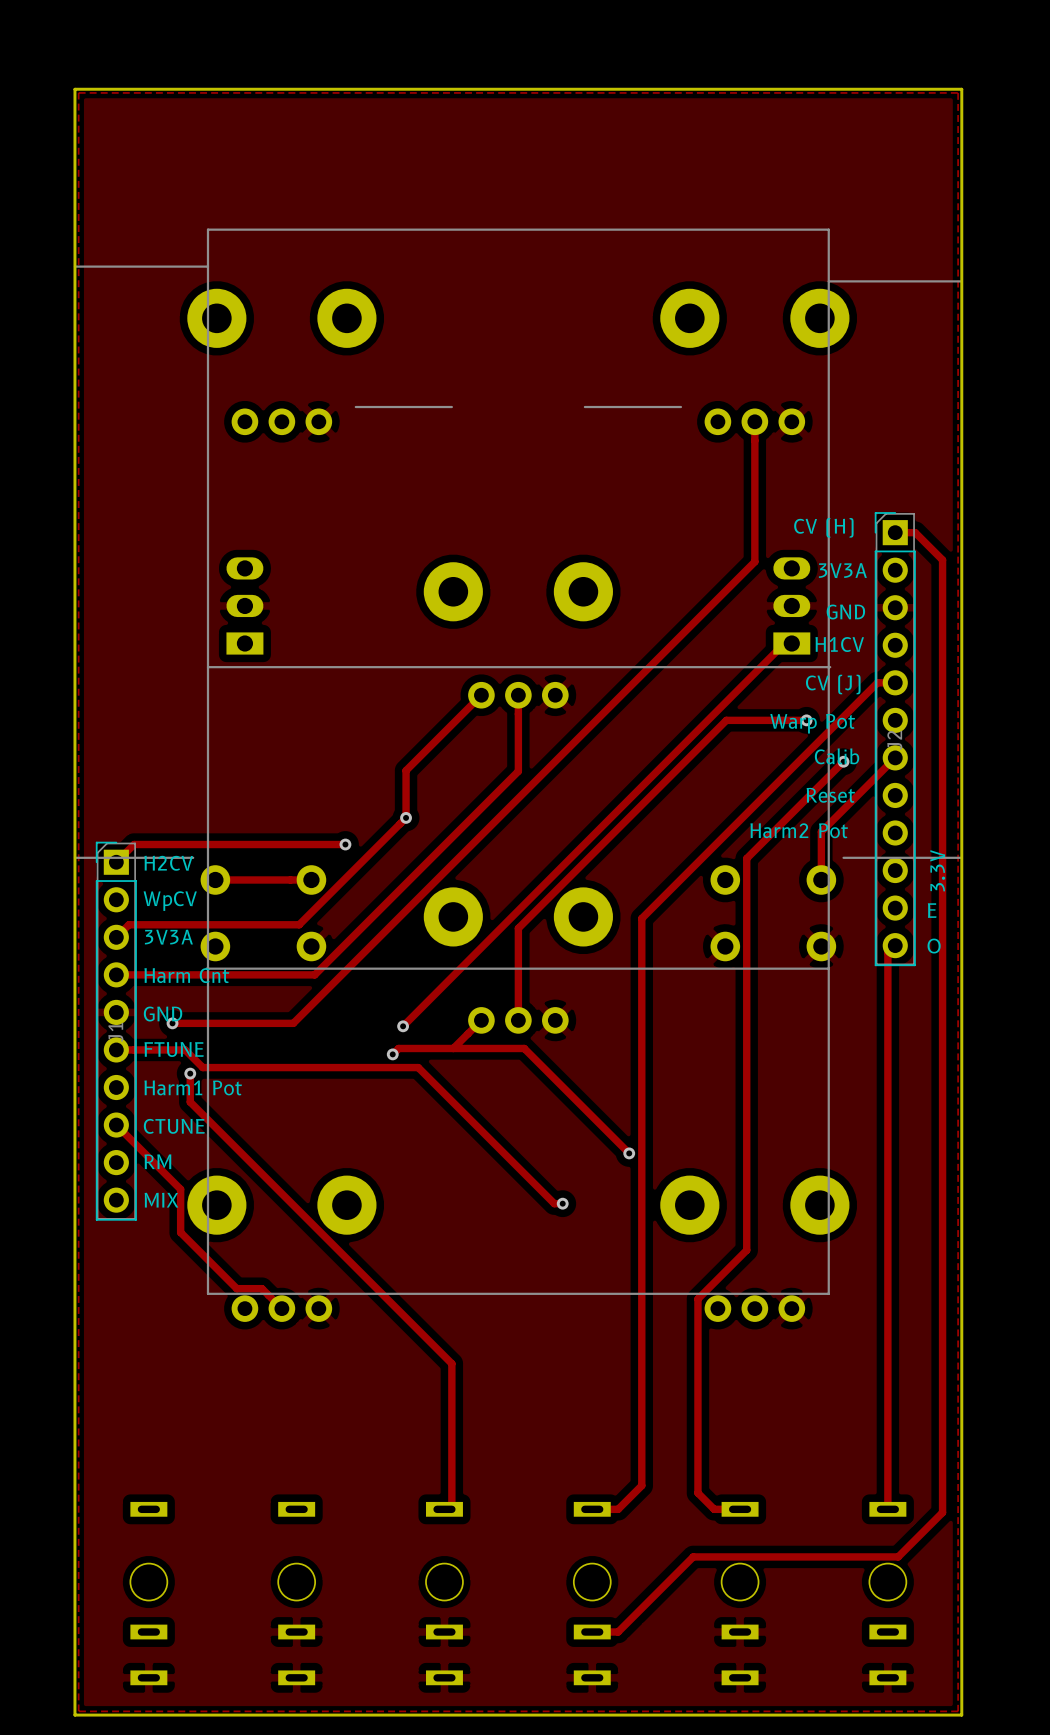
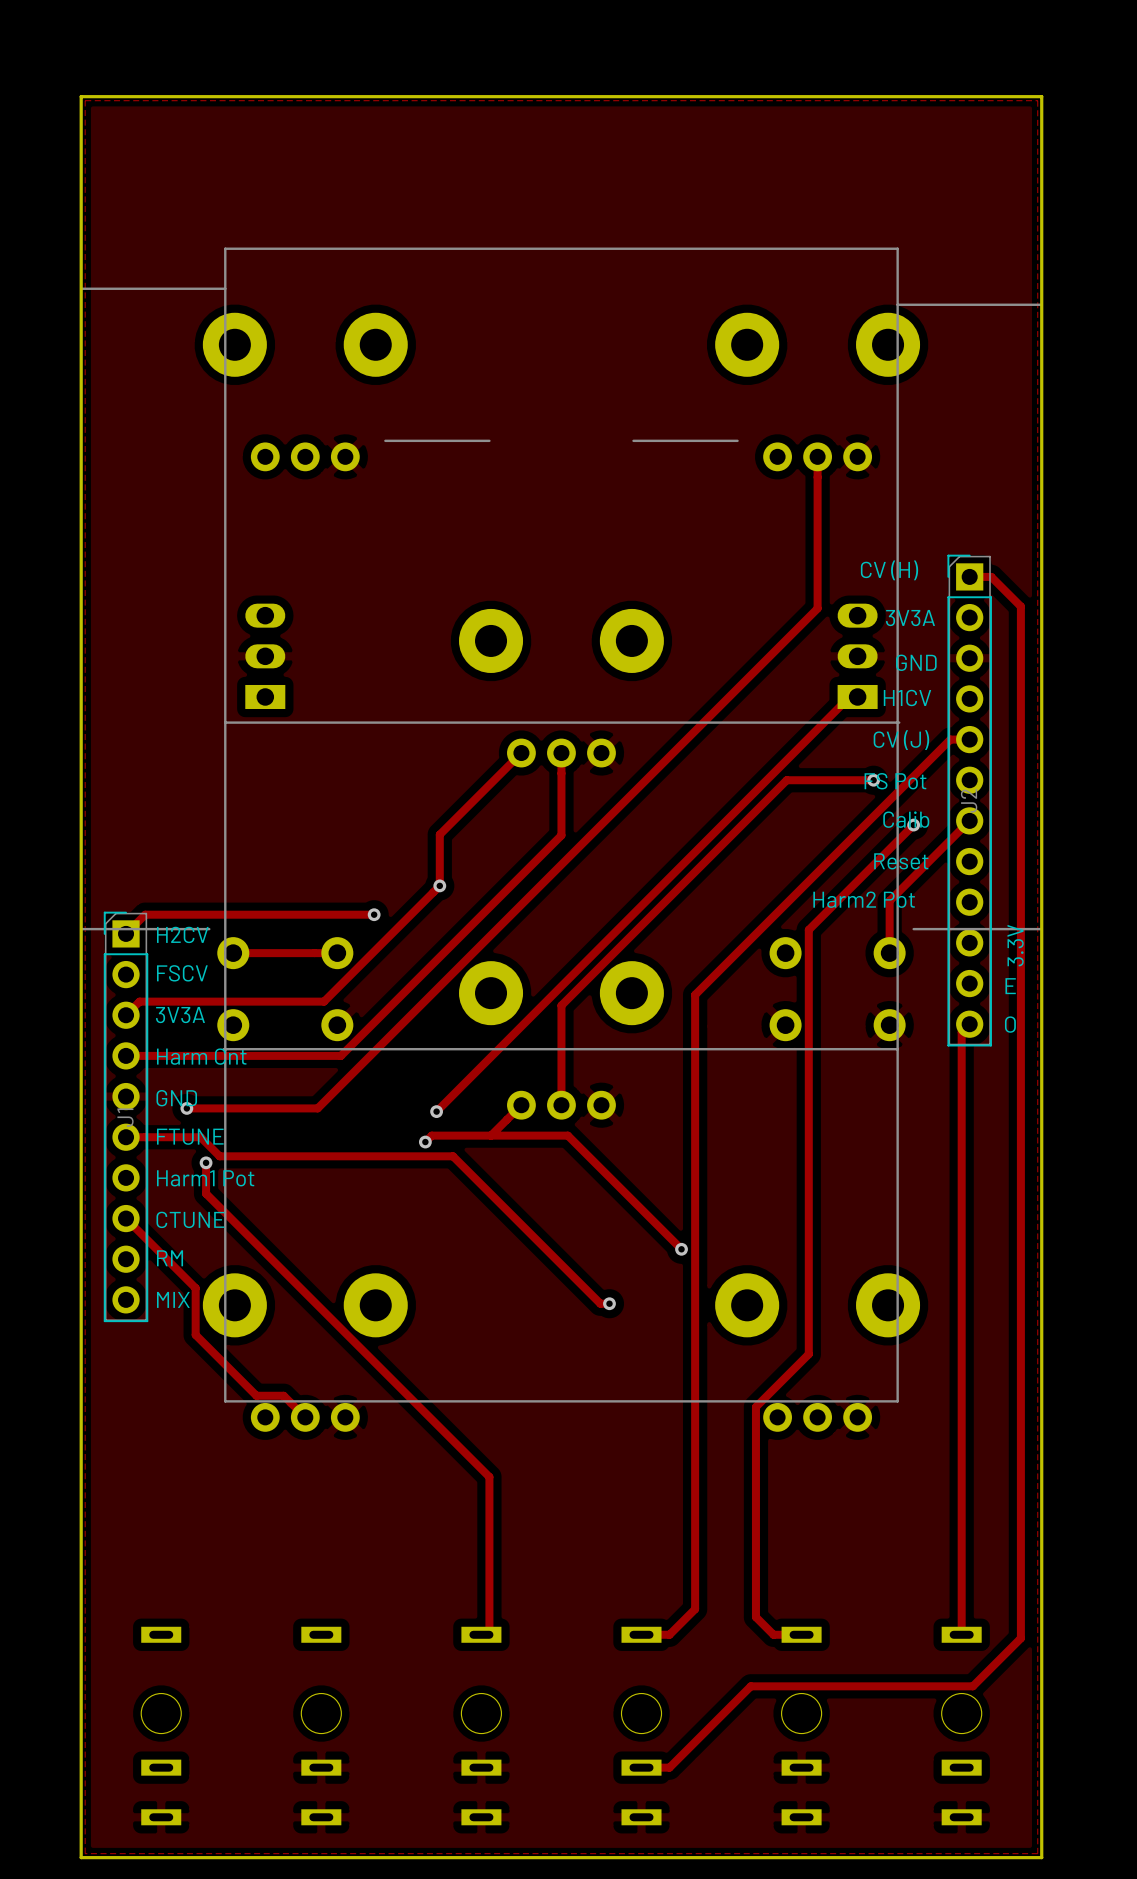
text: none -> FS Pot (895, 781)
text: Warp Pot (812, 723) -> none
text: WpCV (170, 901) -> FSCV (182, 973)

